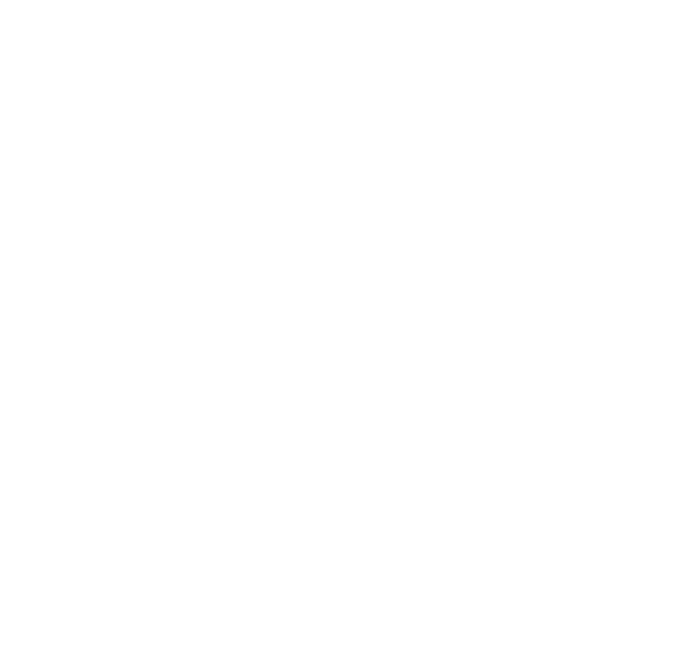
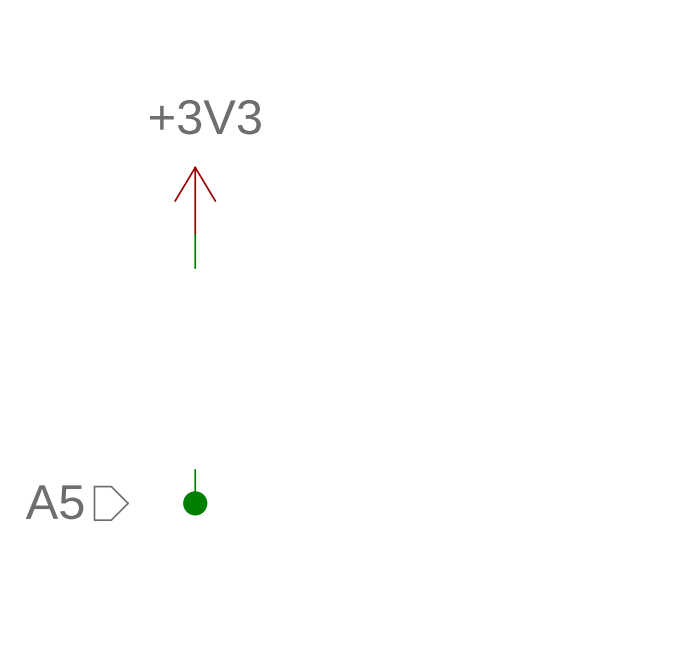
power symbol: none -> +3V3 (195, 201)
wire: none -> (195, 234) (195, 268)
wire: none -> (195, 469) (195, 503)
hierarchical label: none -> A5 (54, 502)
junction: none -> (195, 503)

